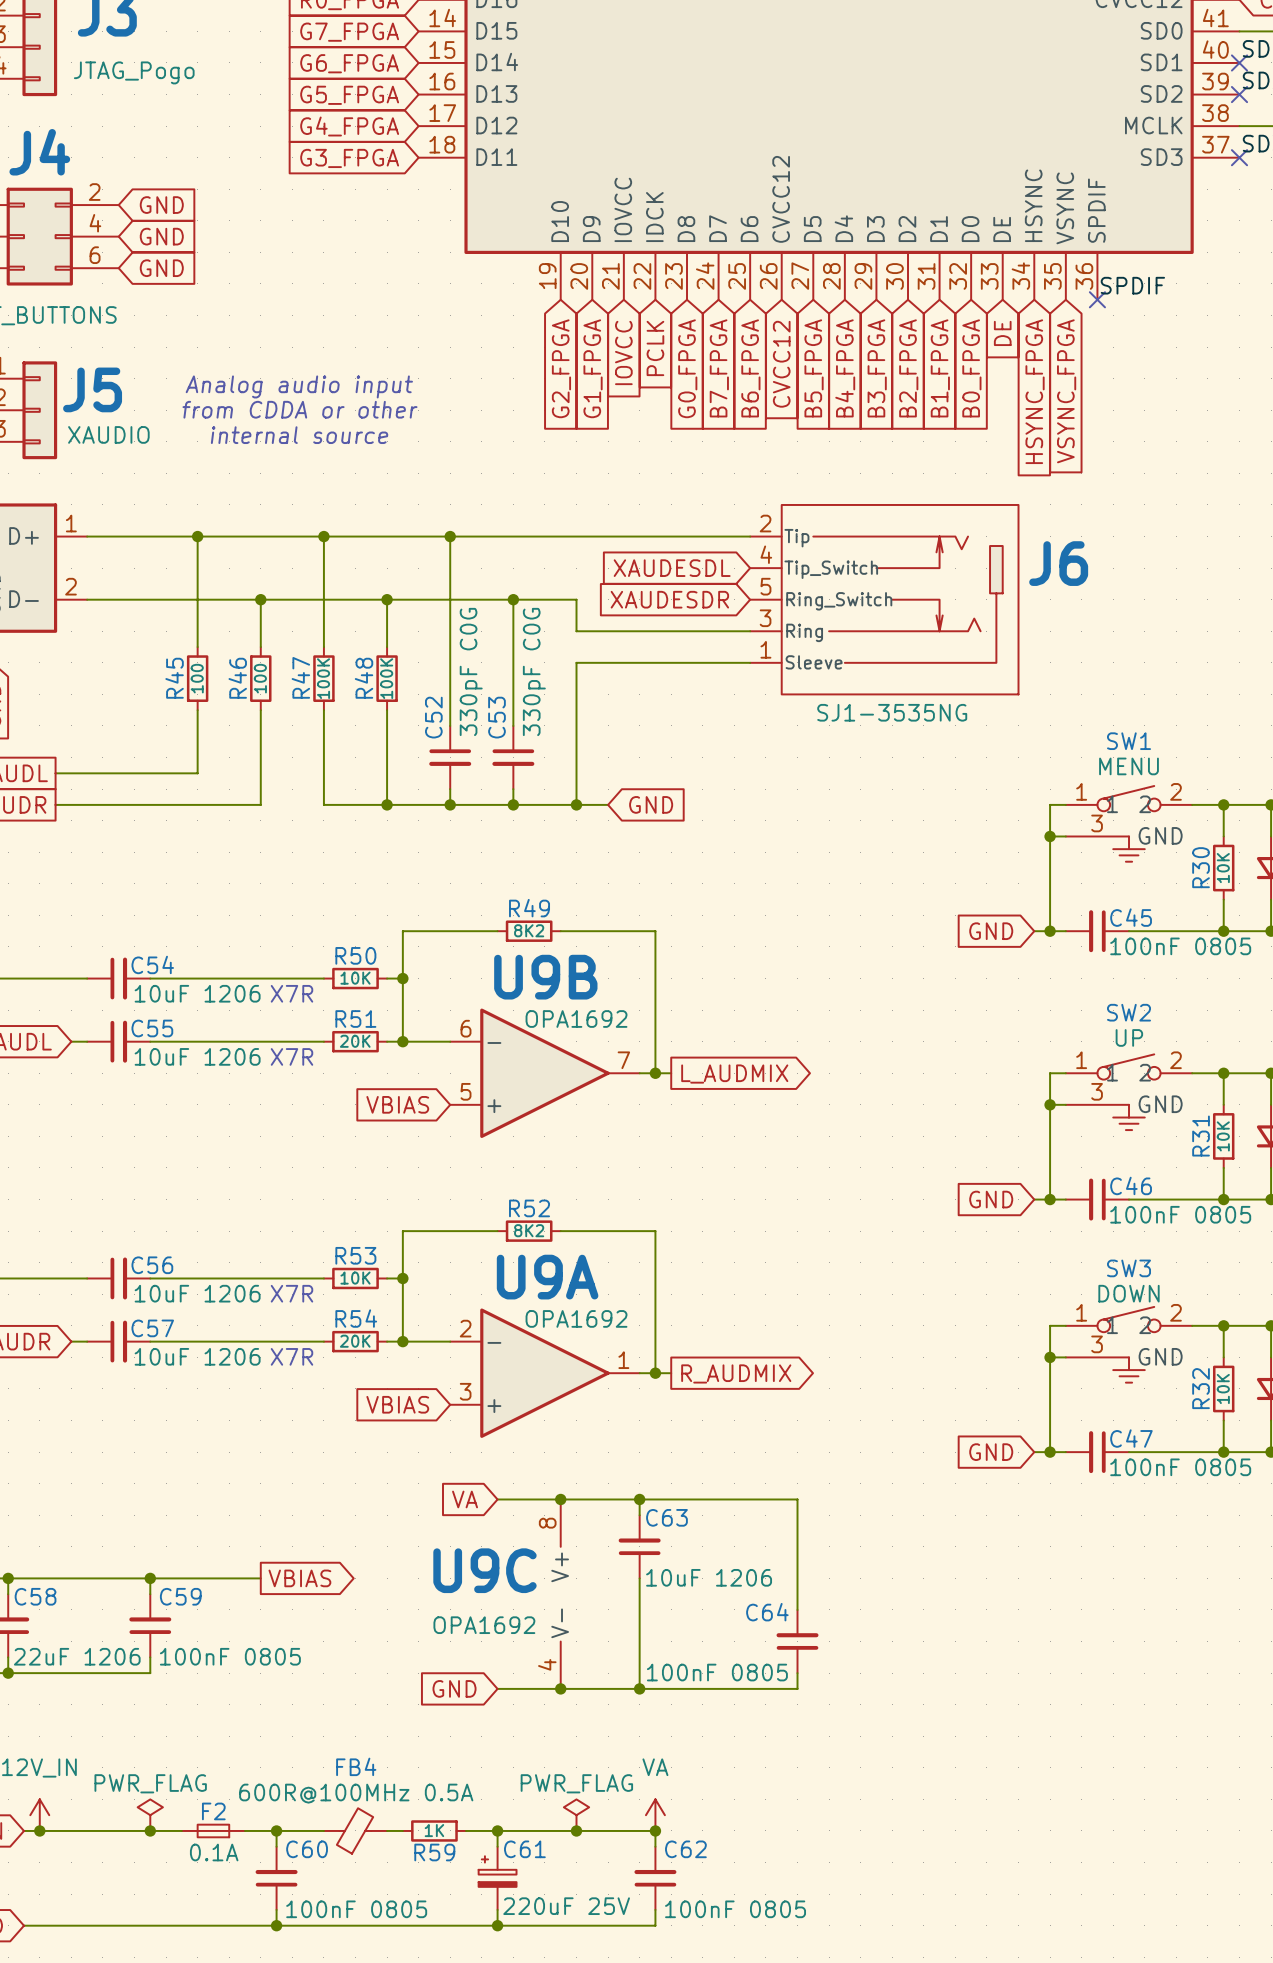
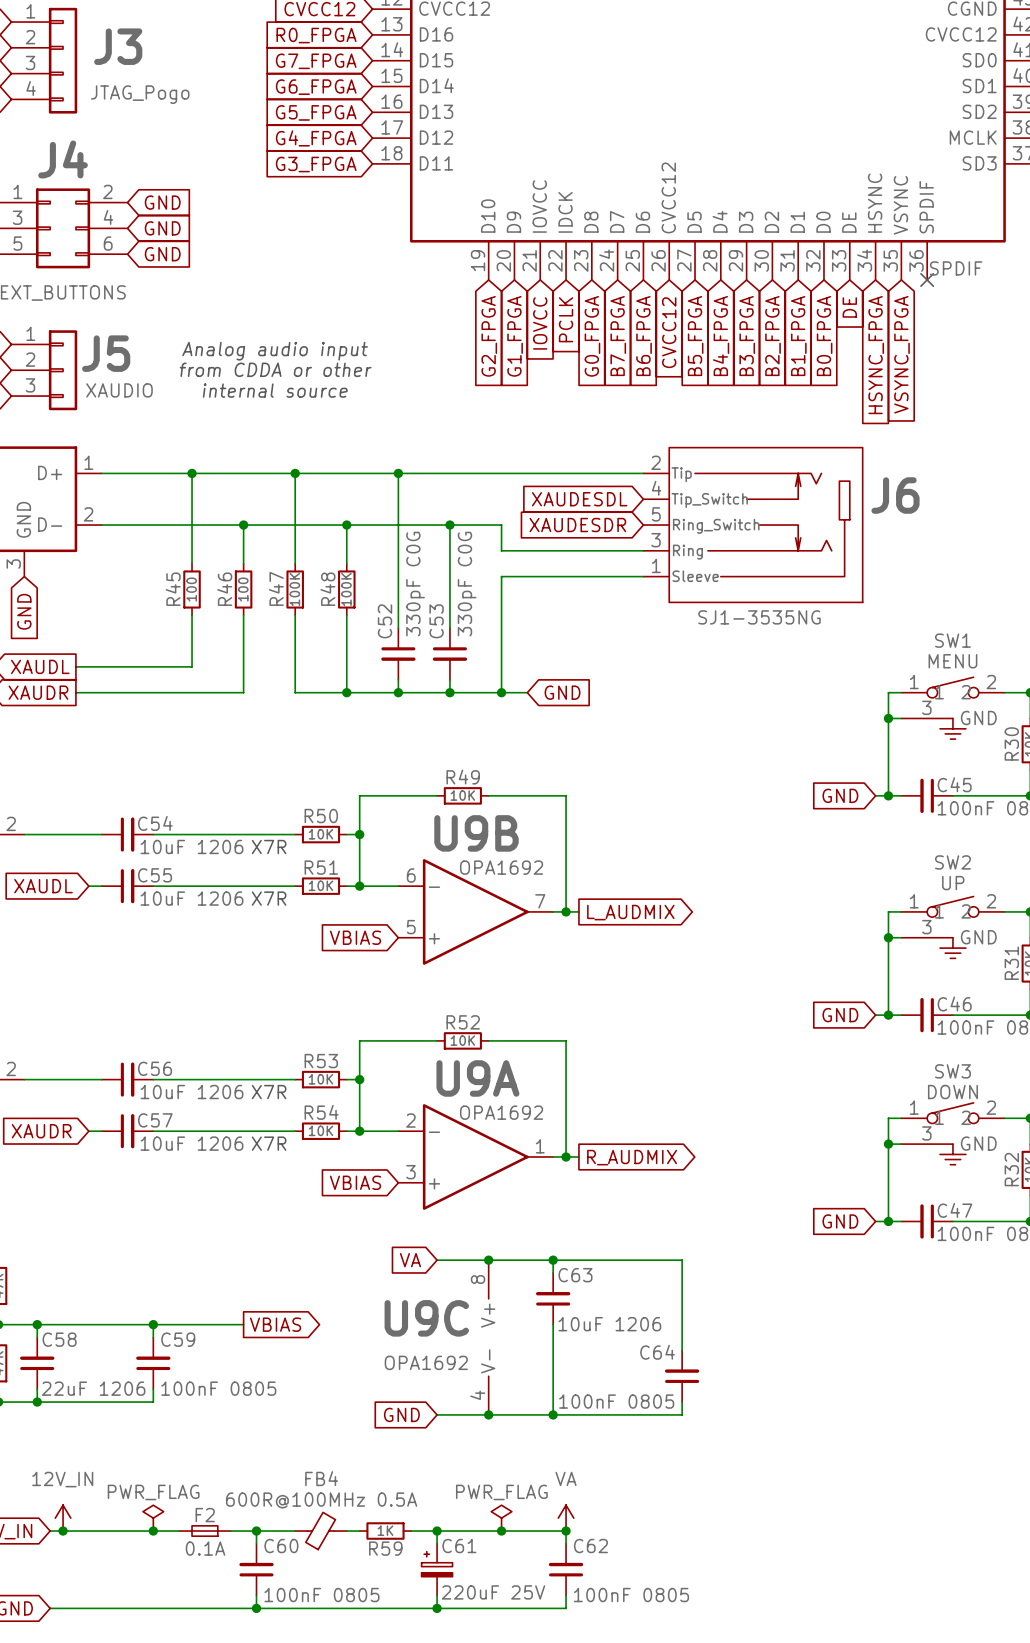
R49 value: 8K2 (529, 930) -> 10K (462, 795)
R51 value: 20K (355, 1041) -> 10K (320, 885)
R52 value: 8K2 (529, 1230) -> 10K (462, 1040)
R54 value: 20K (355, 1341) -> 10K (320, 1130)

